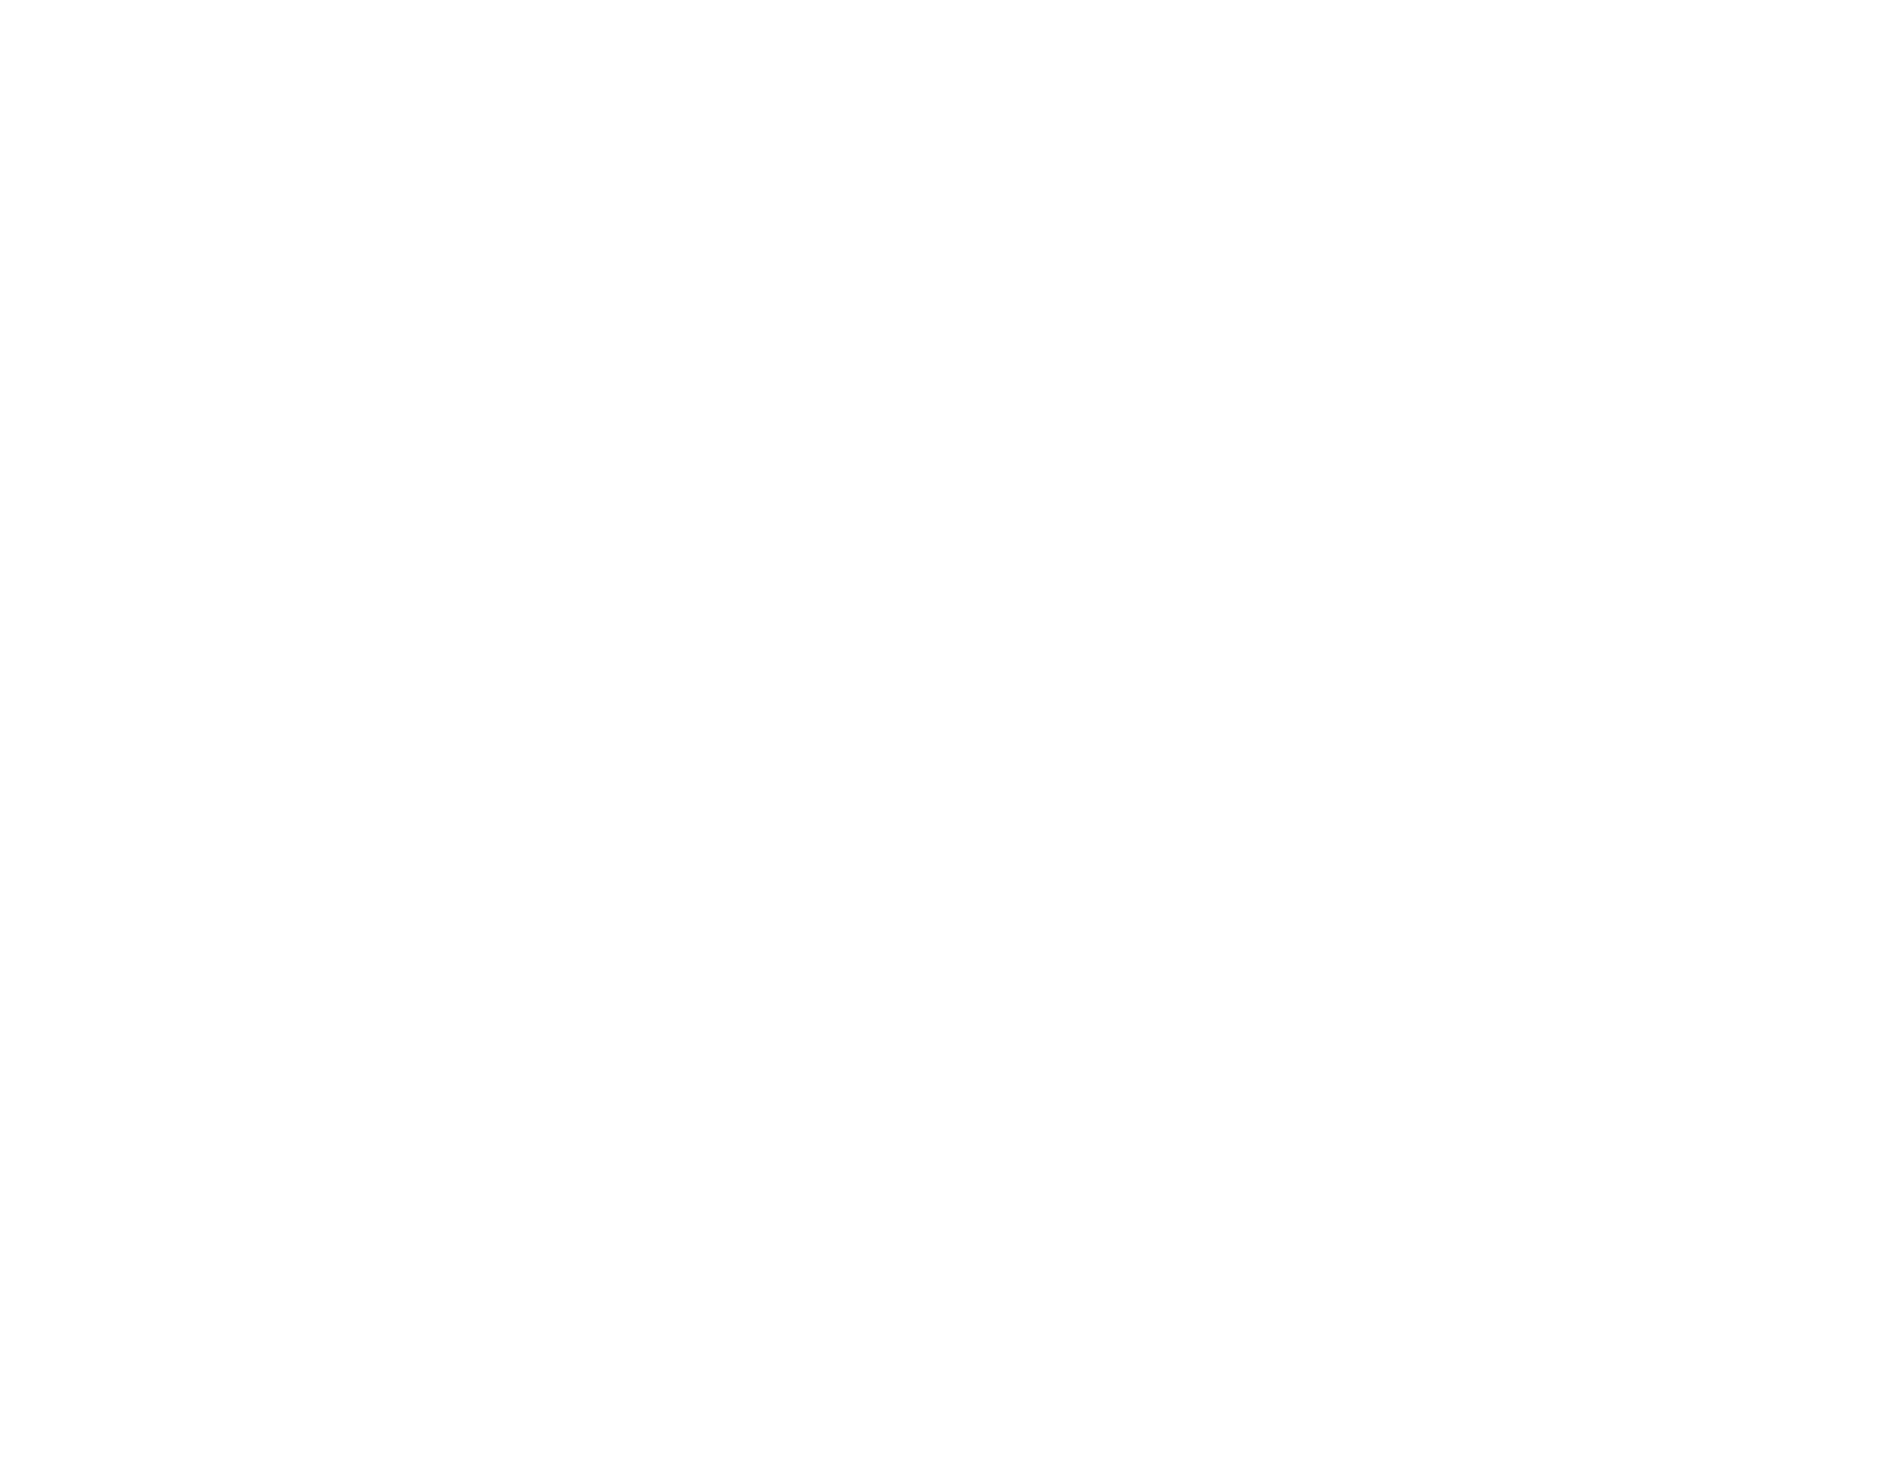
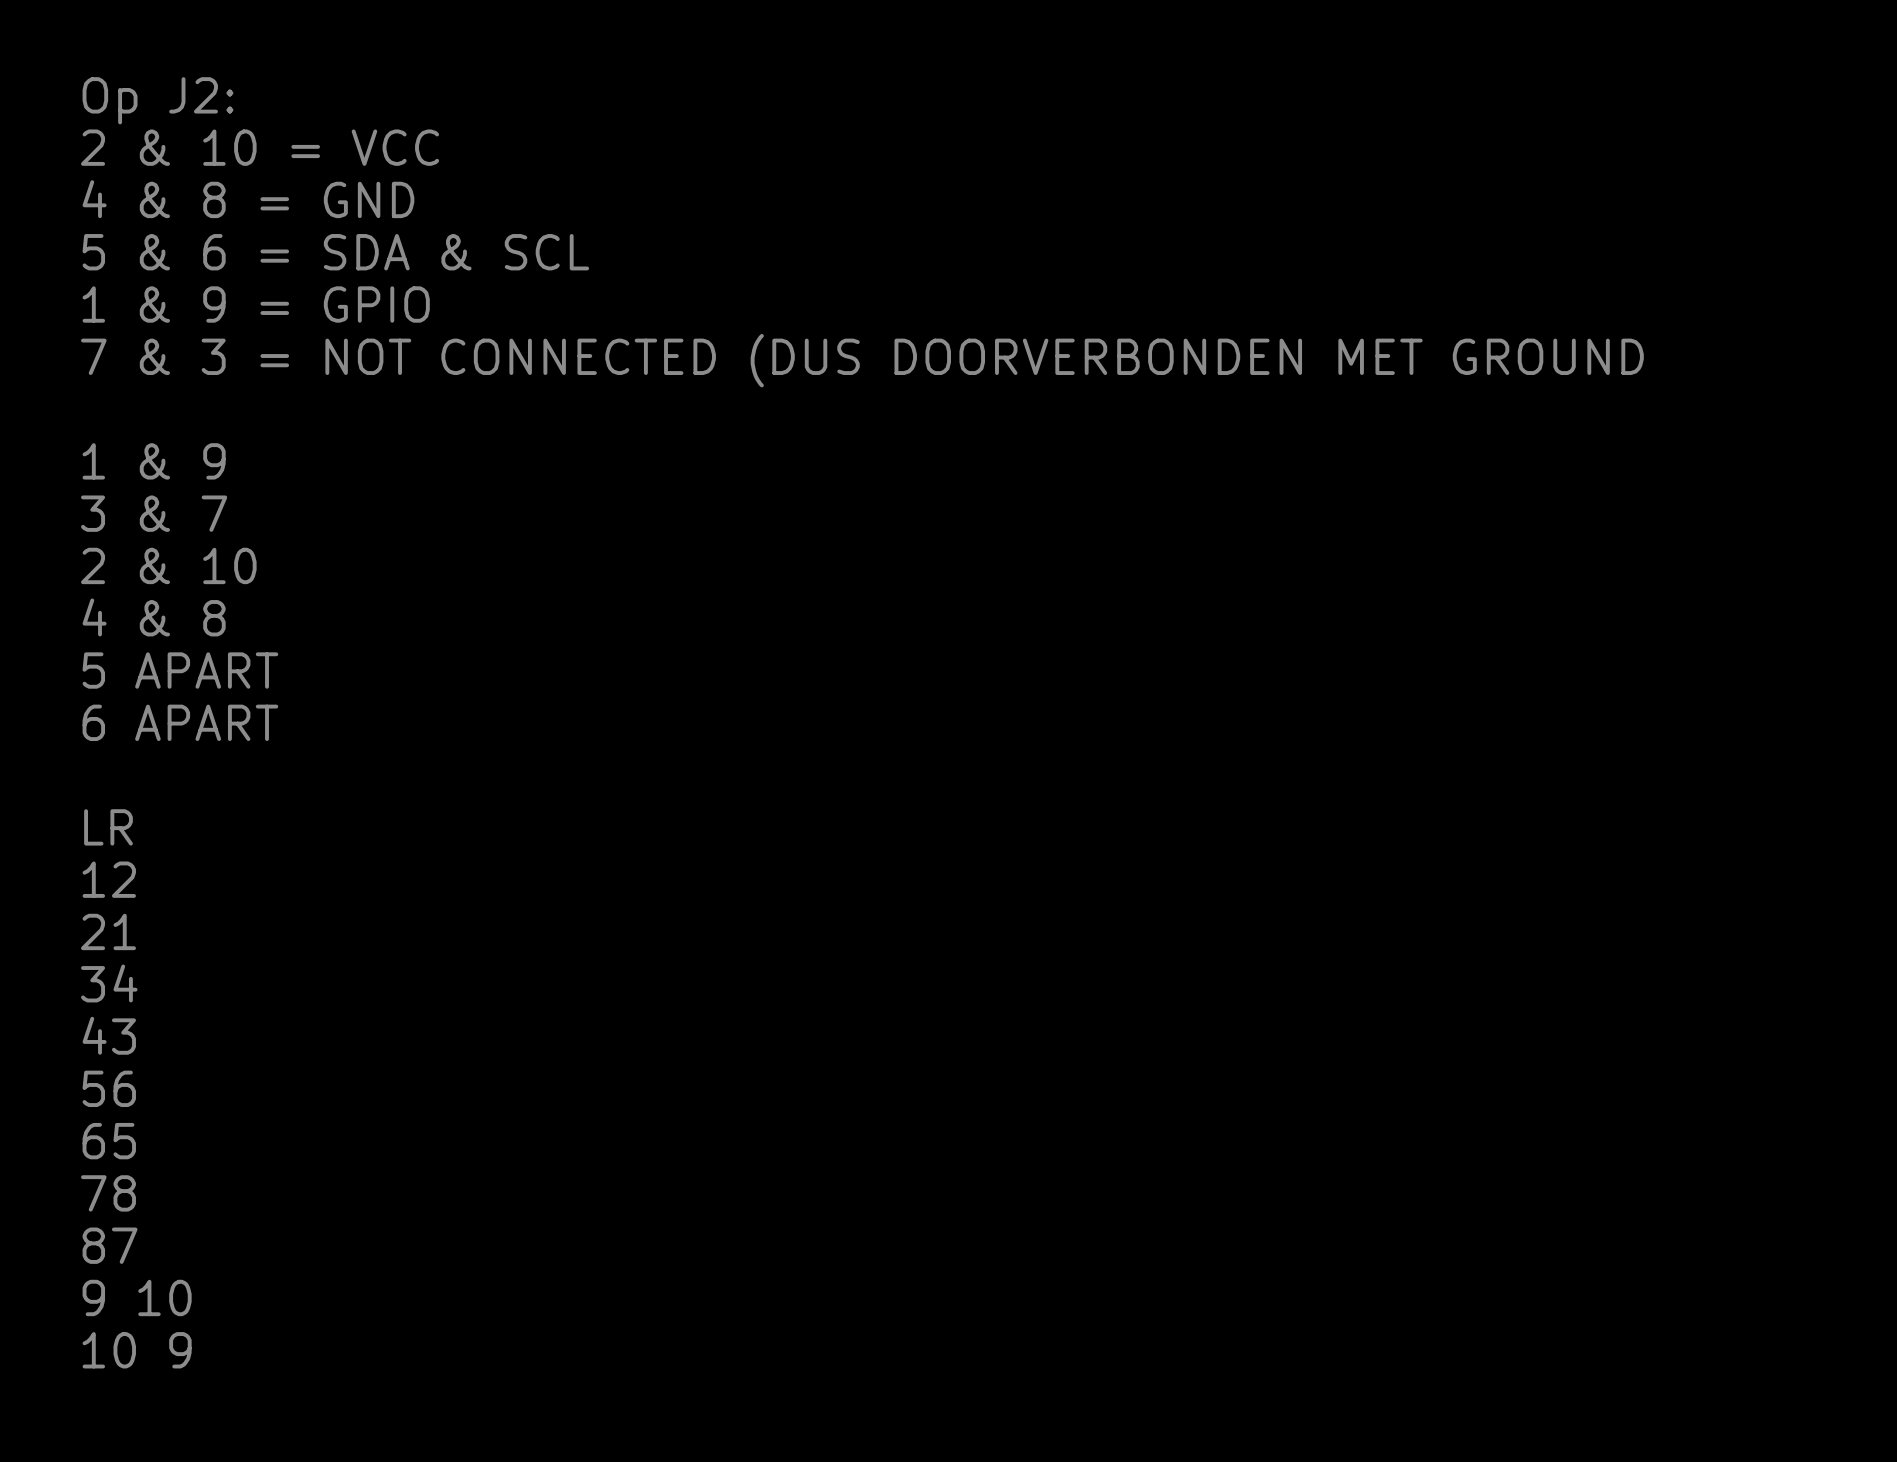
text: none -> Op J2: (157, 100)
text: none -> 2 & 10 = VCC (260, 147)
text: none -> 4 & 8 = GND (248, 199)
text: none -> 5 & 6 = SDA & SCL (335, 252)
text: none -> 1 & 9 = GPIO (256, 304)
text: none -> 7 & 3 = NOT CONNECTED (DUS DOORVERBONDEN MET GROUND (862, 360)
text: none -> 1 & 9 (154, 461)
text: none -> 3 & 7 (154, 513)
text: none -> 2 & 10 (168, 565)
text: none -> 4 & 8 (154, 617)
text: none -> 5 APART (180, 670)
text: none -> 6 APART (180, 722)
text: none -> LR (108, 827)
text: none -> 12 (109, 879)
text: none -> 21 (108, 931)
text: none -> 34 (109, 983)
text: none -> 43 (109, 1035)
text: none -> 56 (109, 1088)
text: none -> 65 (109, 1141)
text: none -> 78 (108, 1193)
text: none -> 87 (110, 1245)
text: none -> 9 10 (137, 1297)
text: none -> 10 9 (137, 1350)

